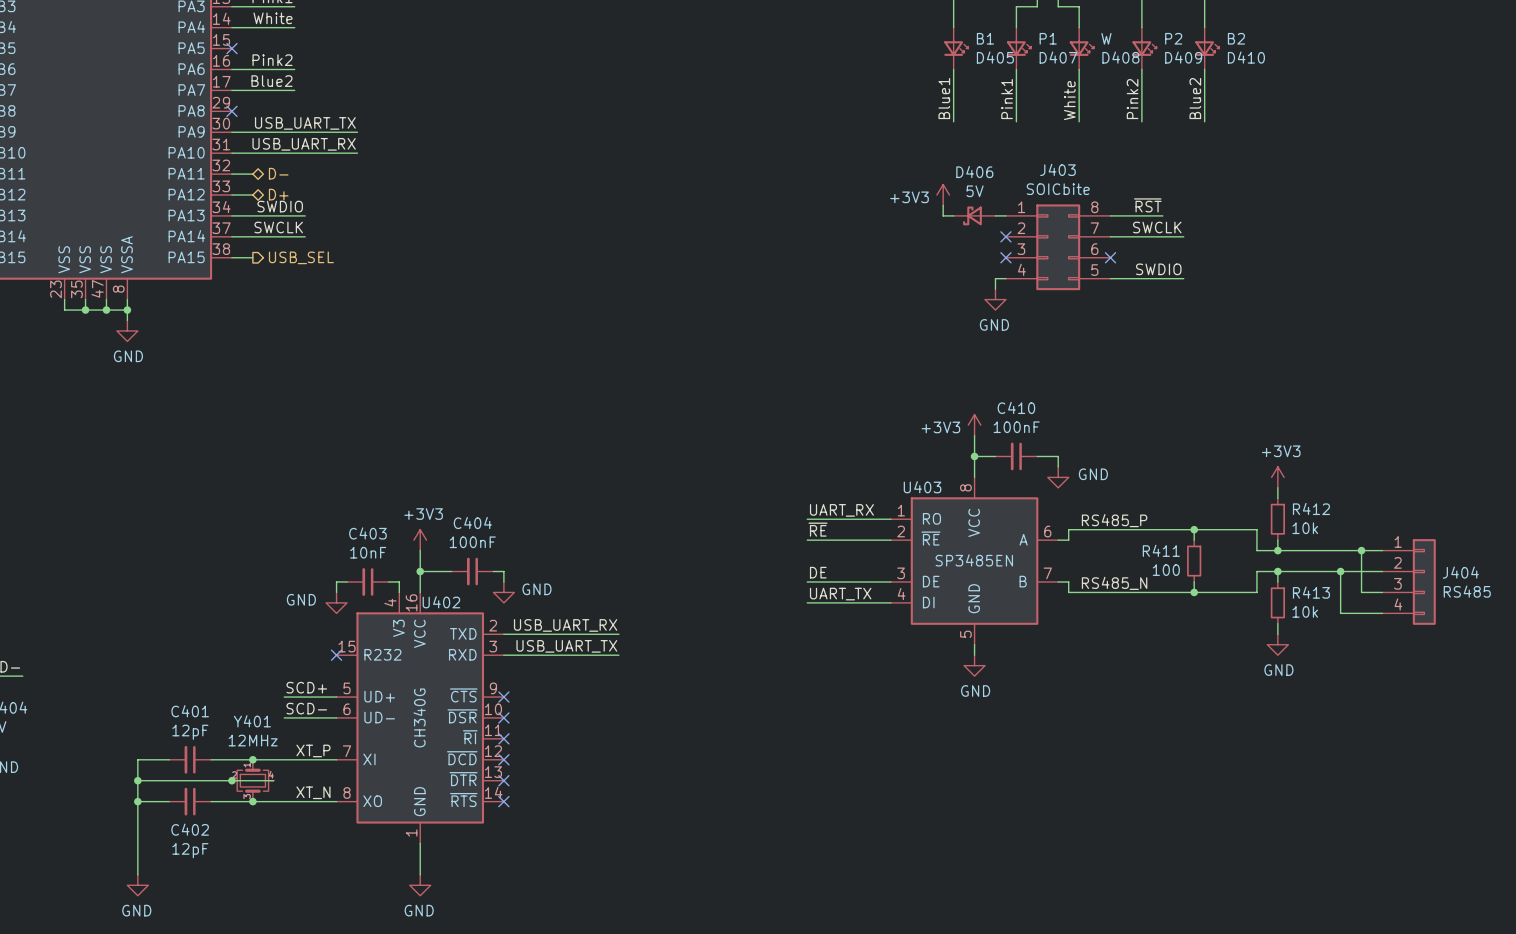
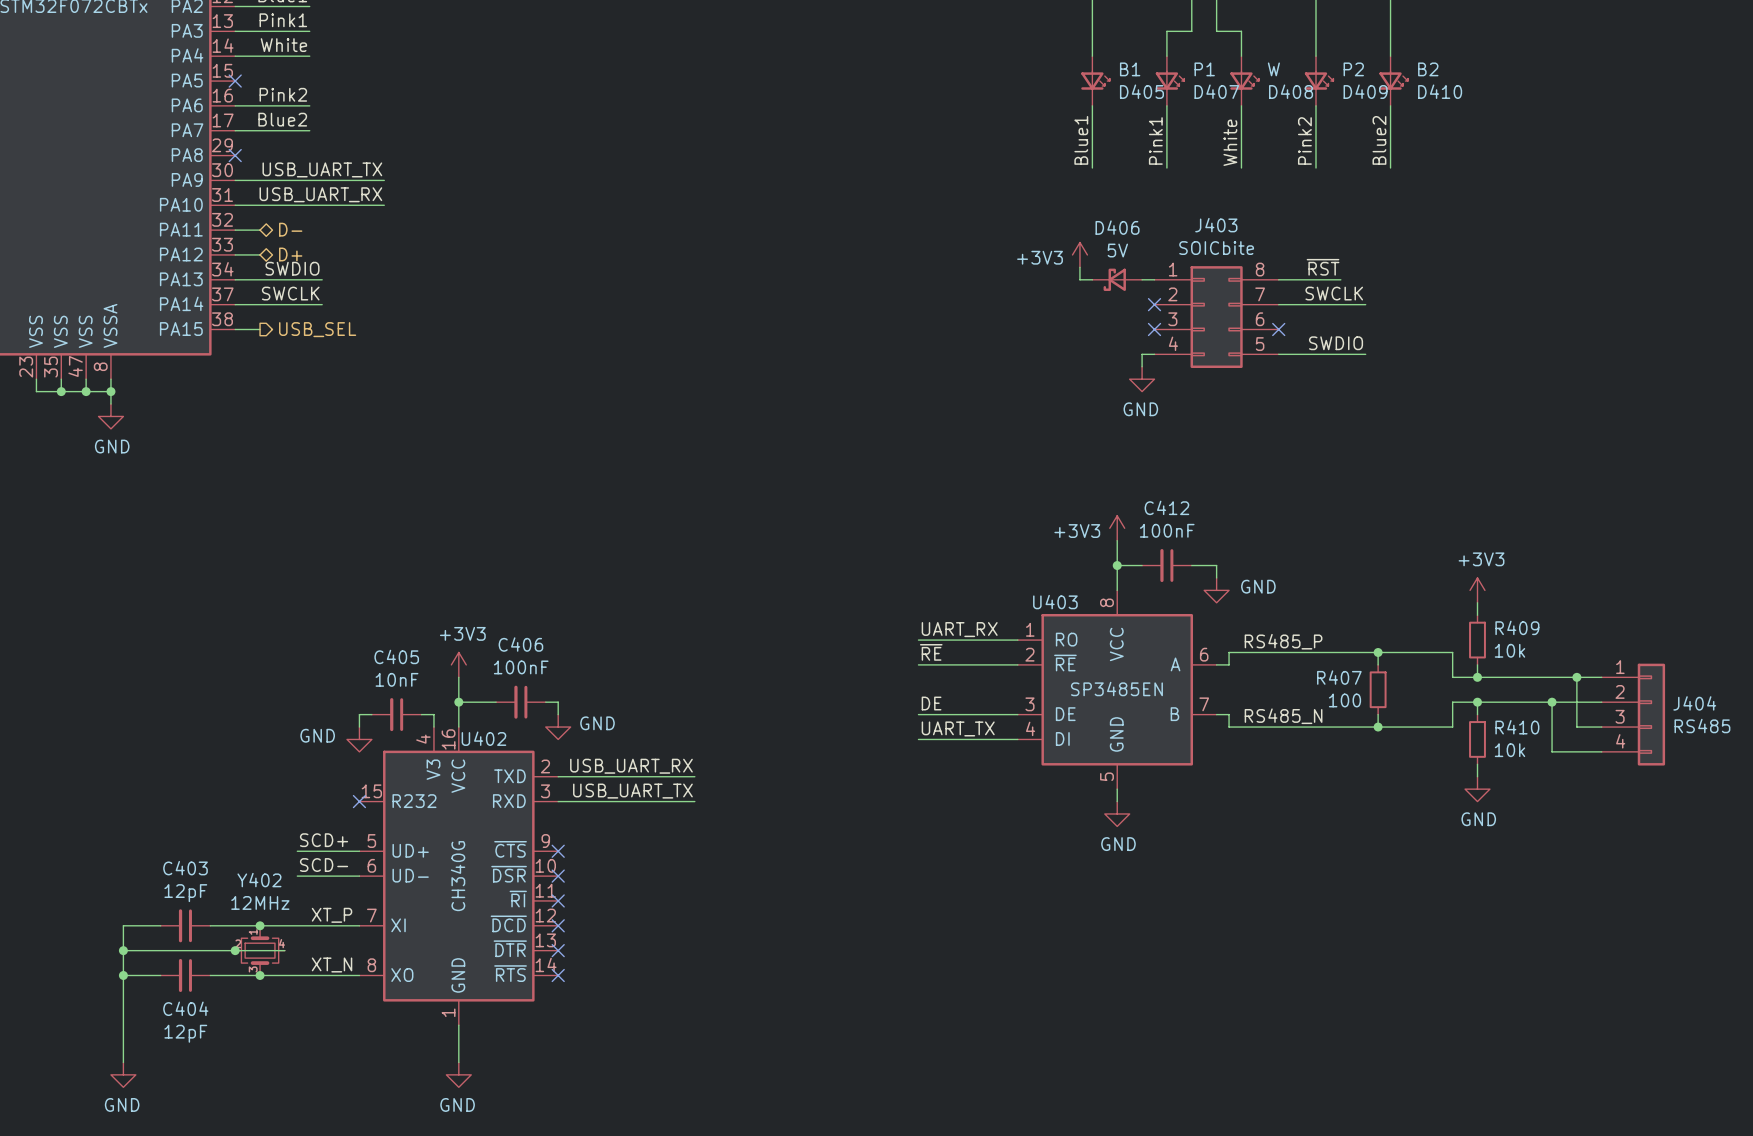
C410 name: C410 (1016, 407) -> C412 (1166, 507)
R412 name: R412 (1311, 508) -> R409 (1517, 627)
C404 name: C404 (472, 522) -> C406 (520, 644)
C403 name: C403 (367, 533) -> C405 (396, 656)
R411 name: R411 (1161, 550) -> R407 (1339, 677)
R413 name: R413 (1311, 592) -> R410 (1517, 727)
C401 name: C401 (190, 711) -> C403 (185, 868)
Y401 name: Y401 (252, 721) -> Y402 (259, 880)
C402 name: C402 (190, 829) -> C404 (185, 1008)

